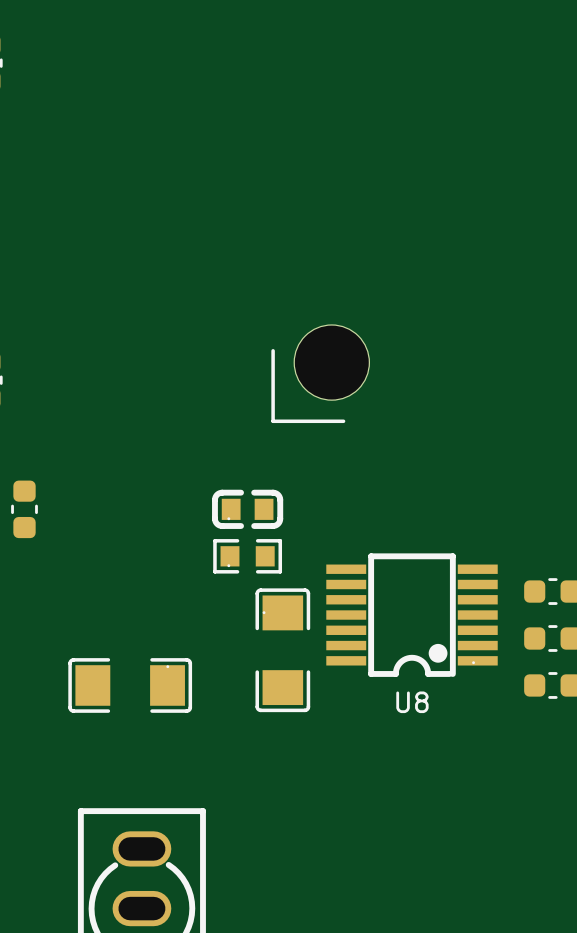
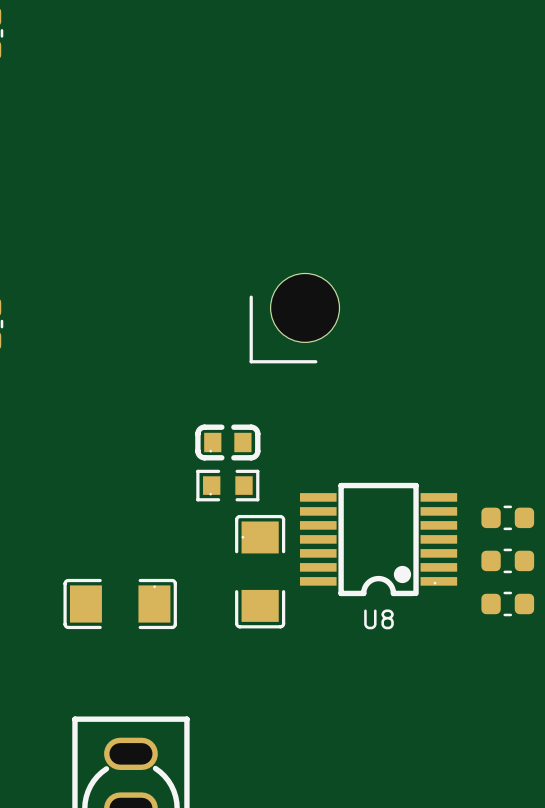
part: (24, 509) -> none

